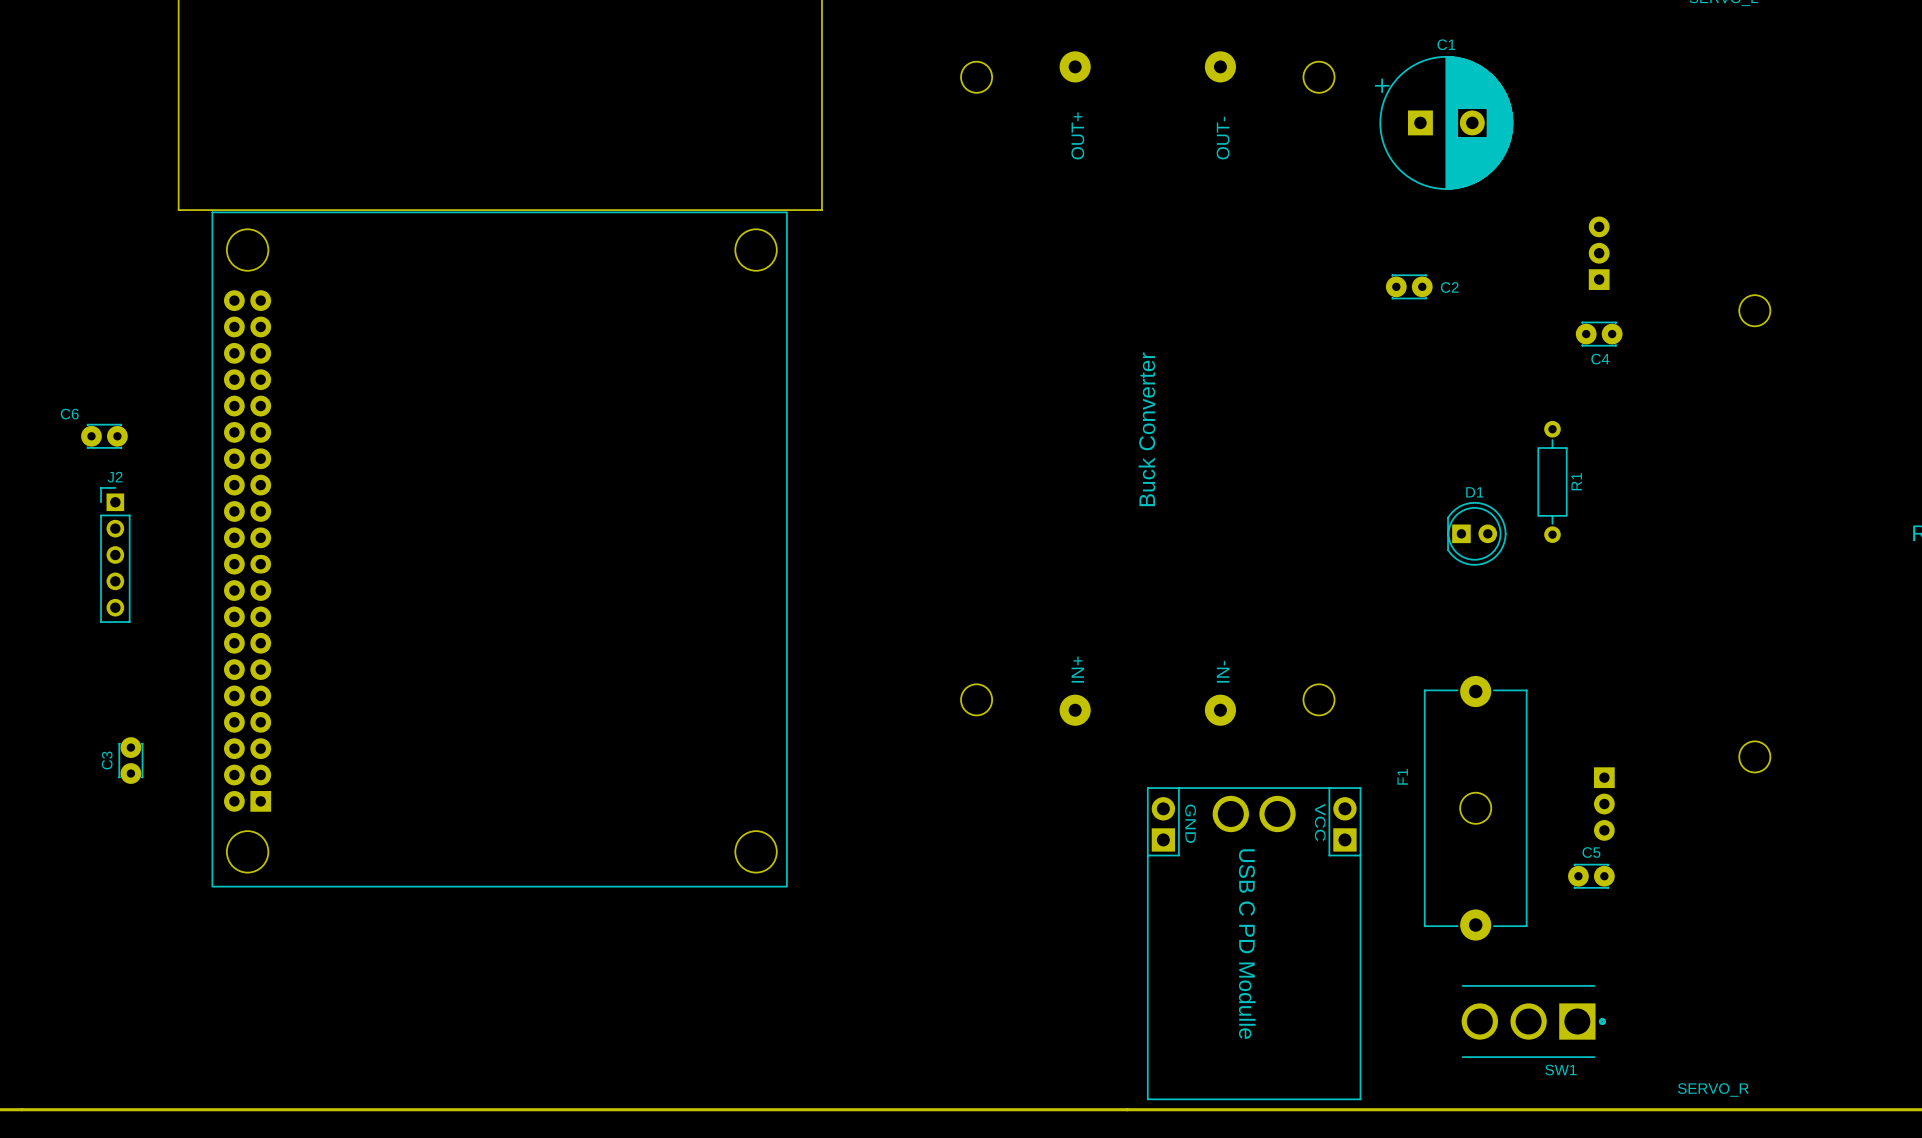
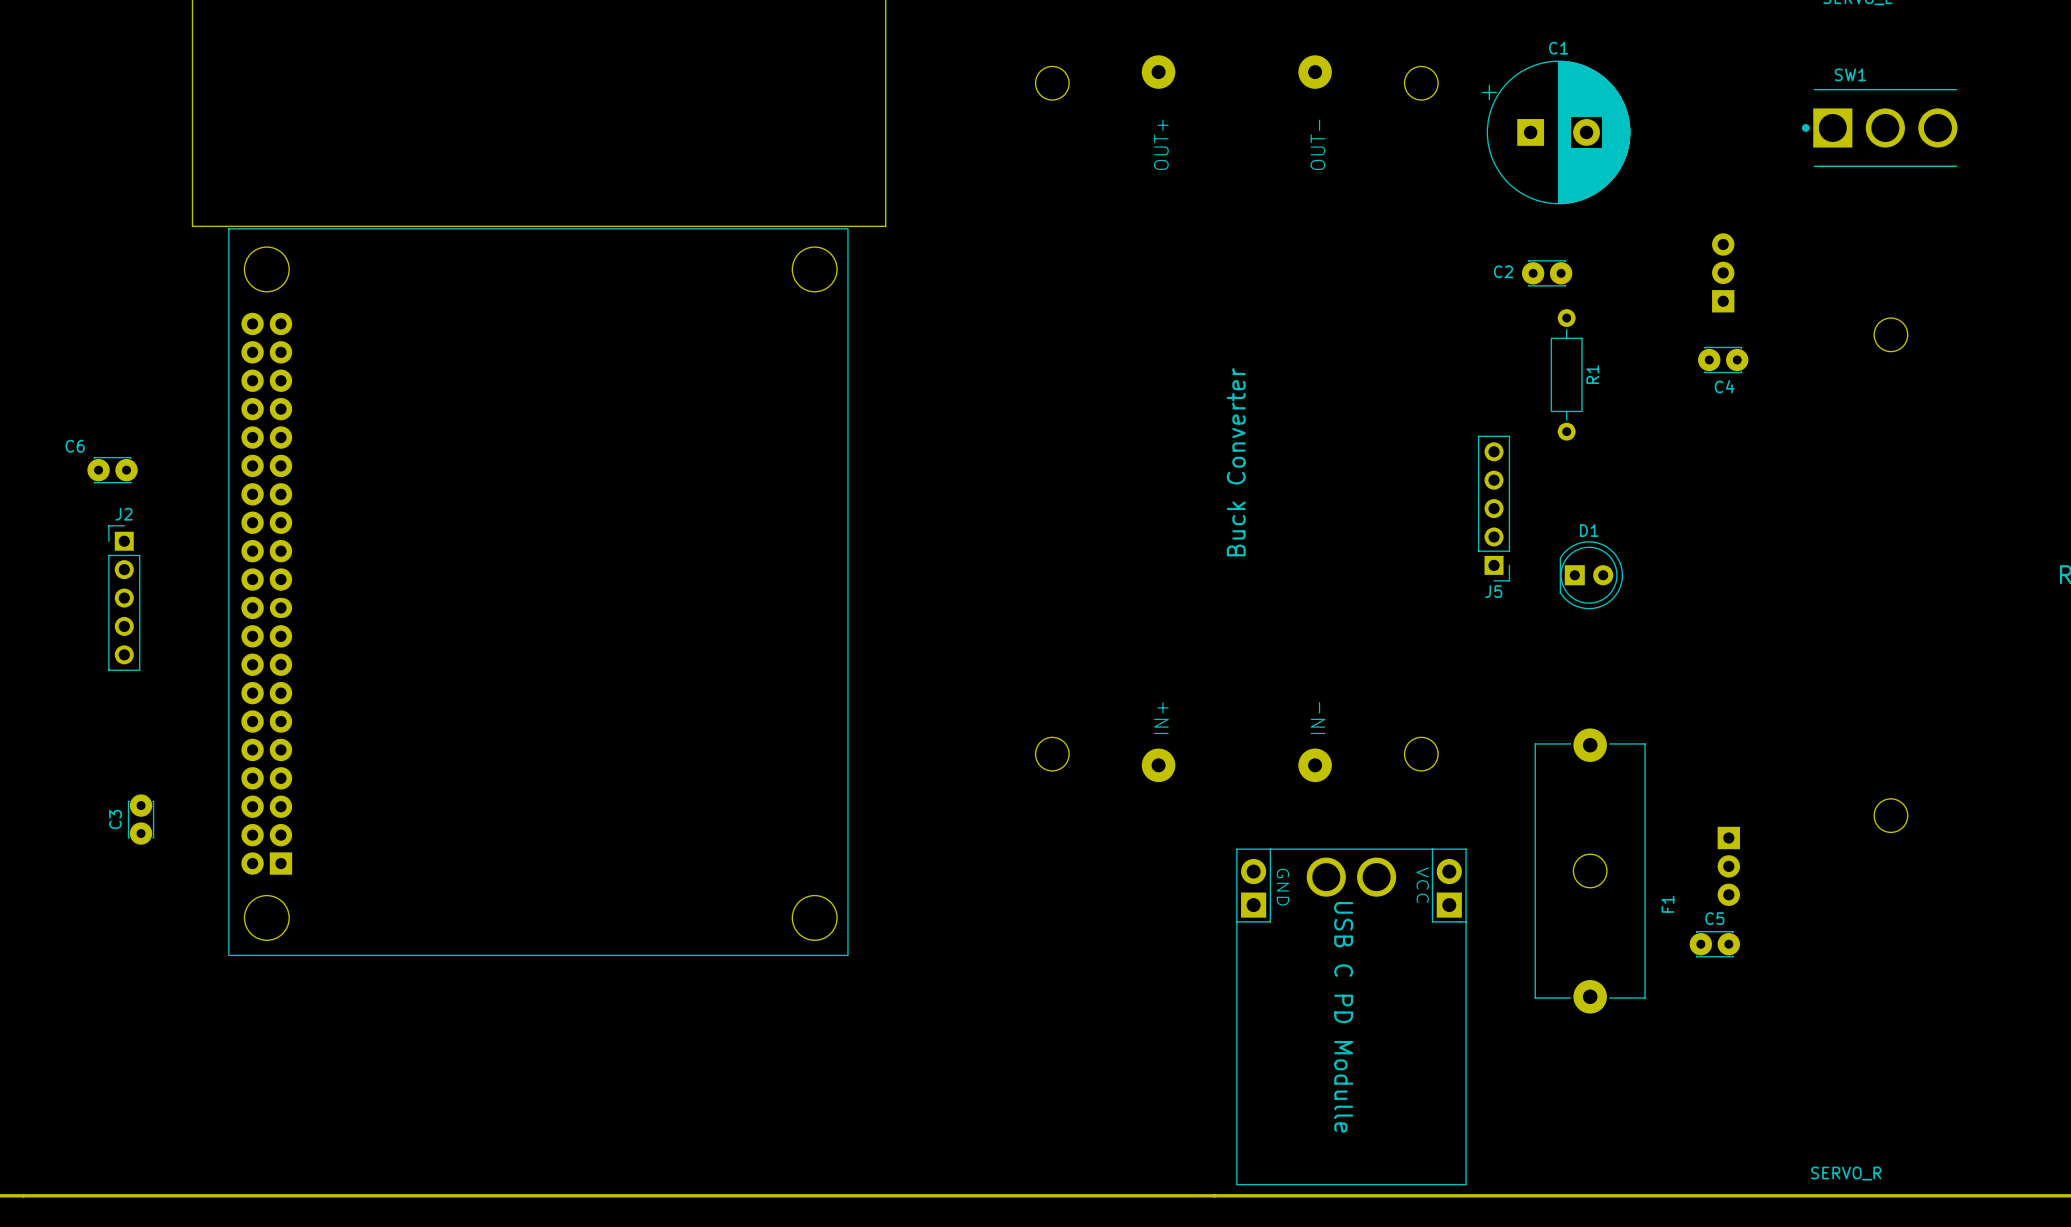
C2 position: (1409, 286) -> (1547, 273)
C2 name position: C2 (1449, 287) -> C2 (1503, 271)
J5: none -> (1494, 508)
R1 position: (1552, 481) -> (1566, 374)
F1 name position: F1 (1402, 776) -> F1 (1668, 904)
SW1 rotation: 0° (1533, 1021) -> 180° (1879, 127)
SW1 position: (1533, 1021) -> (1879, 127)

